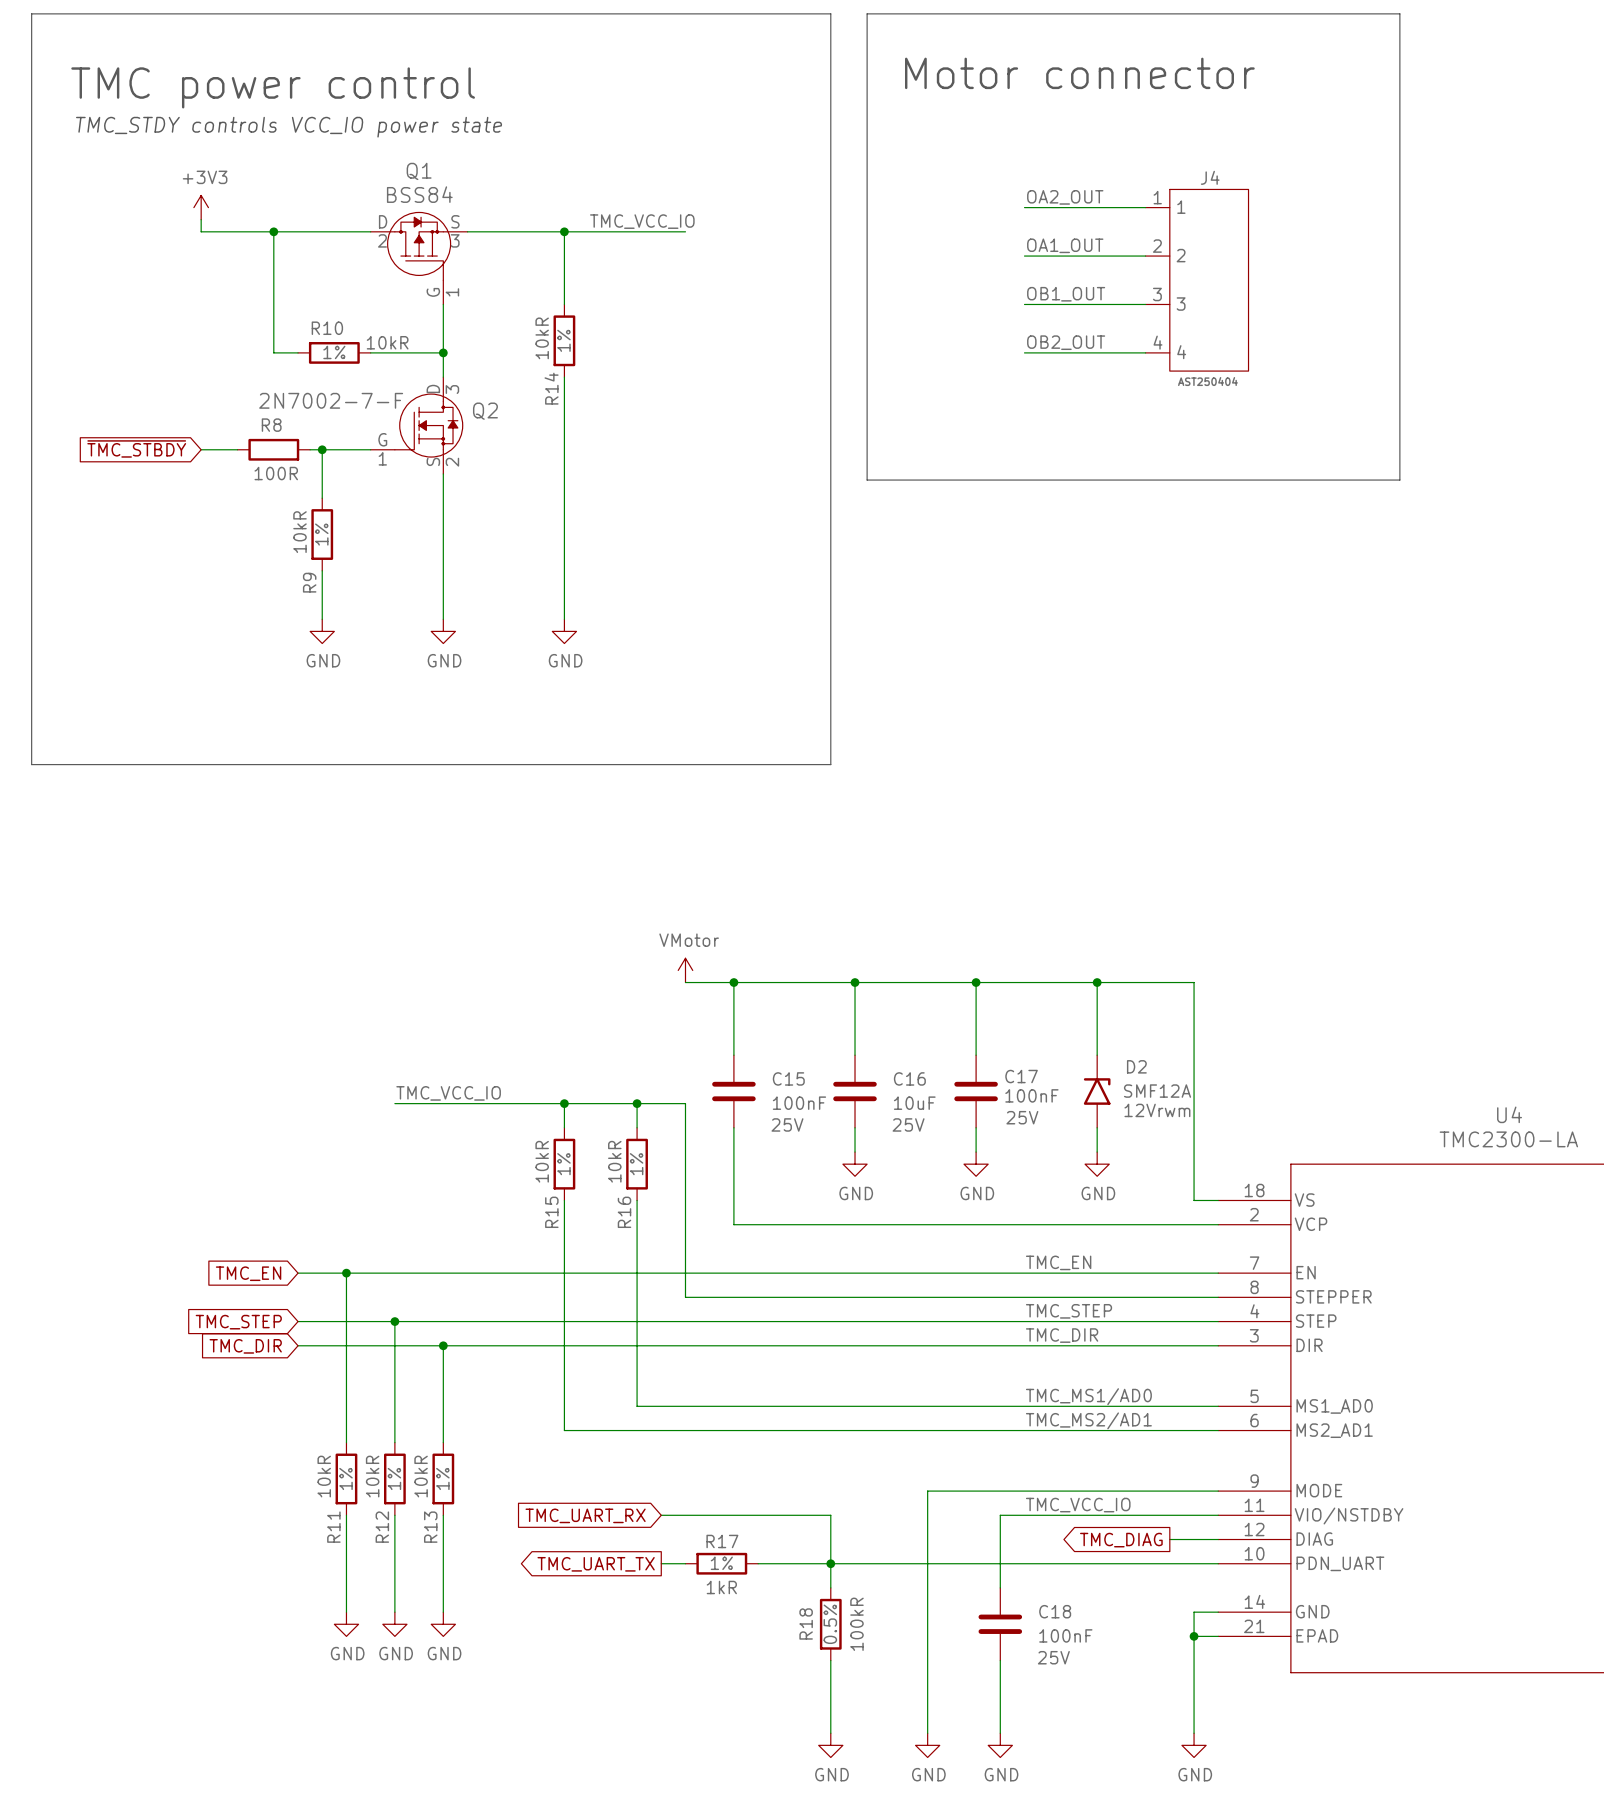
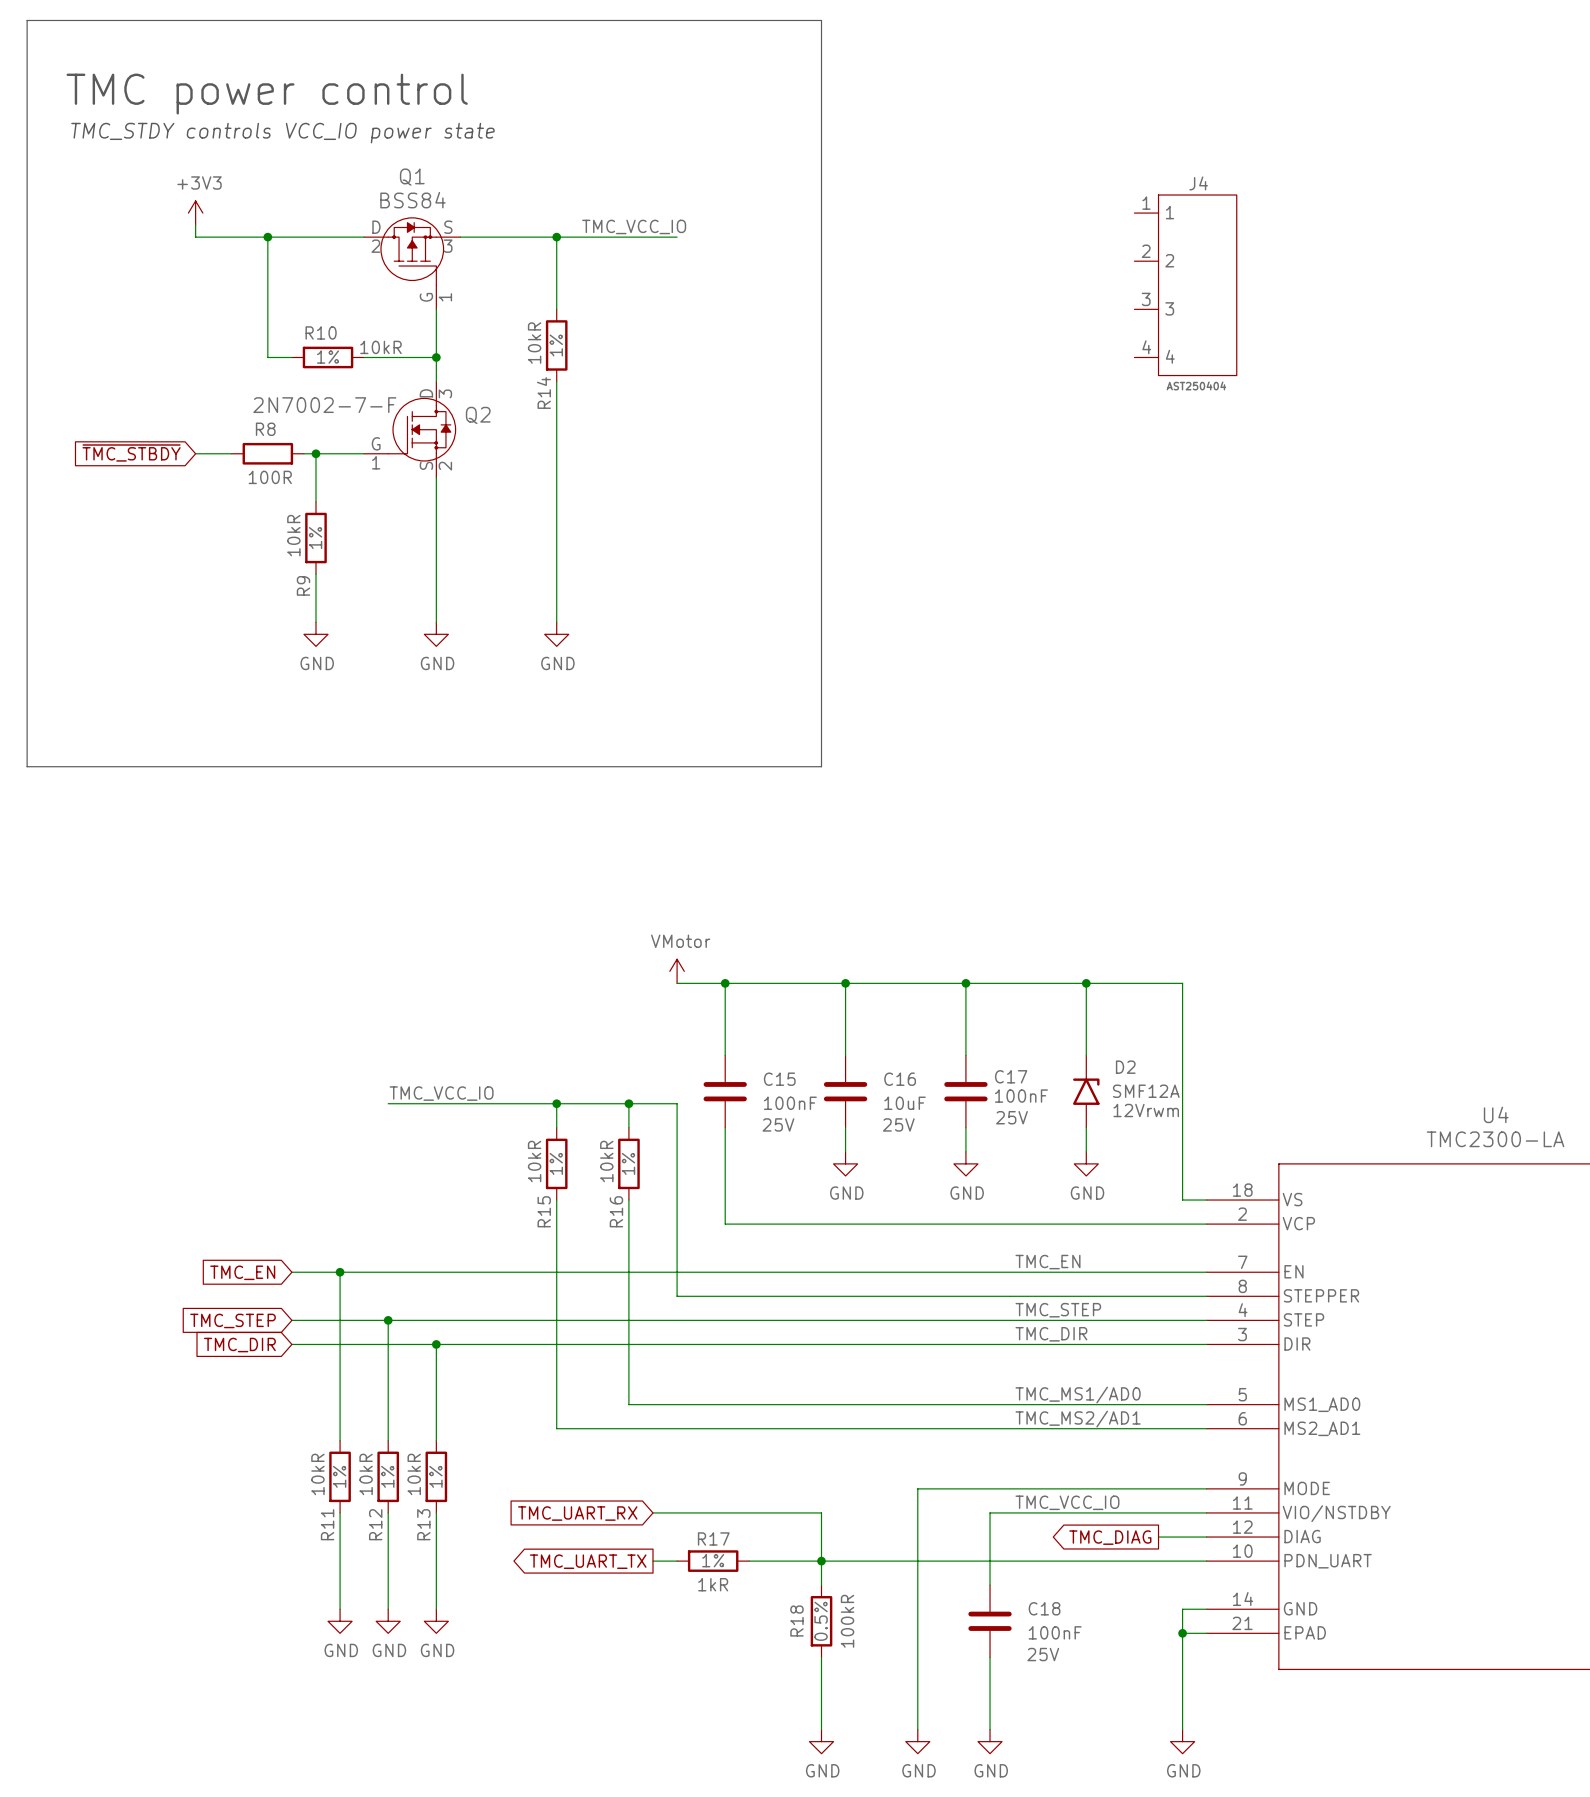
line: (867, 13) (1399, 13) (1399, 480) (867, 480) (867, 13) -> none
text: Motor connector (1079, 73) -> none
label: OA2_OUT (1065, 197) -> none
wire: (1024, 207) (1145, 207) -> none
label: OA1_OUT (1065, 245) -> none
wire: (1024, 256) (1145, 256) -> none
label: OB1_OUT (1066, 294) -> none
wire: (1024, 304) (1145, 304) -> none
label: OB2_OUT (1066, 342) -> none
wire: (1024, 352) (1145, 352) -> none

